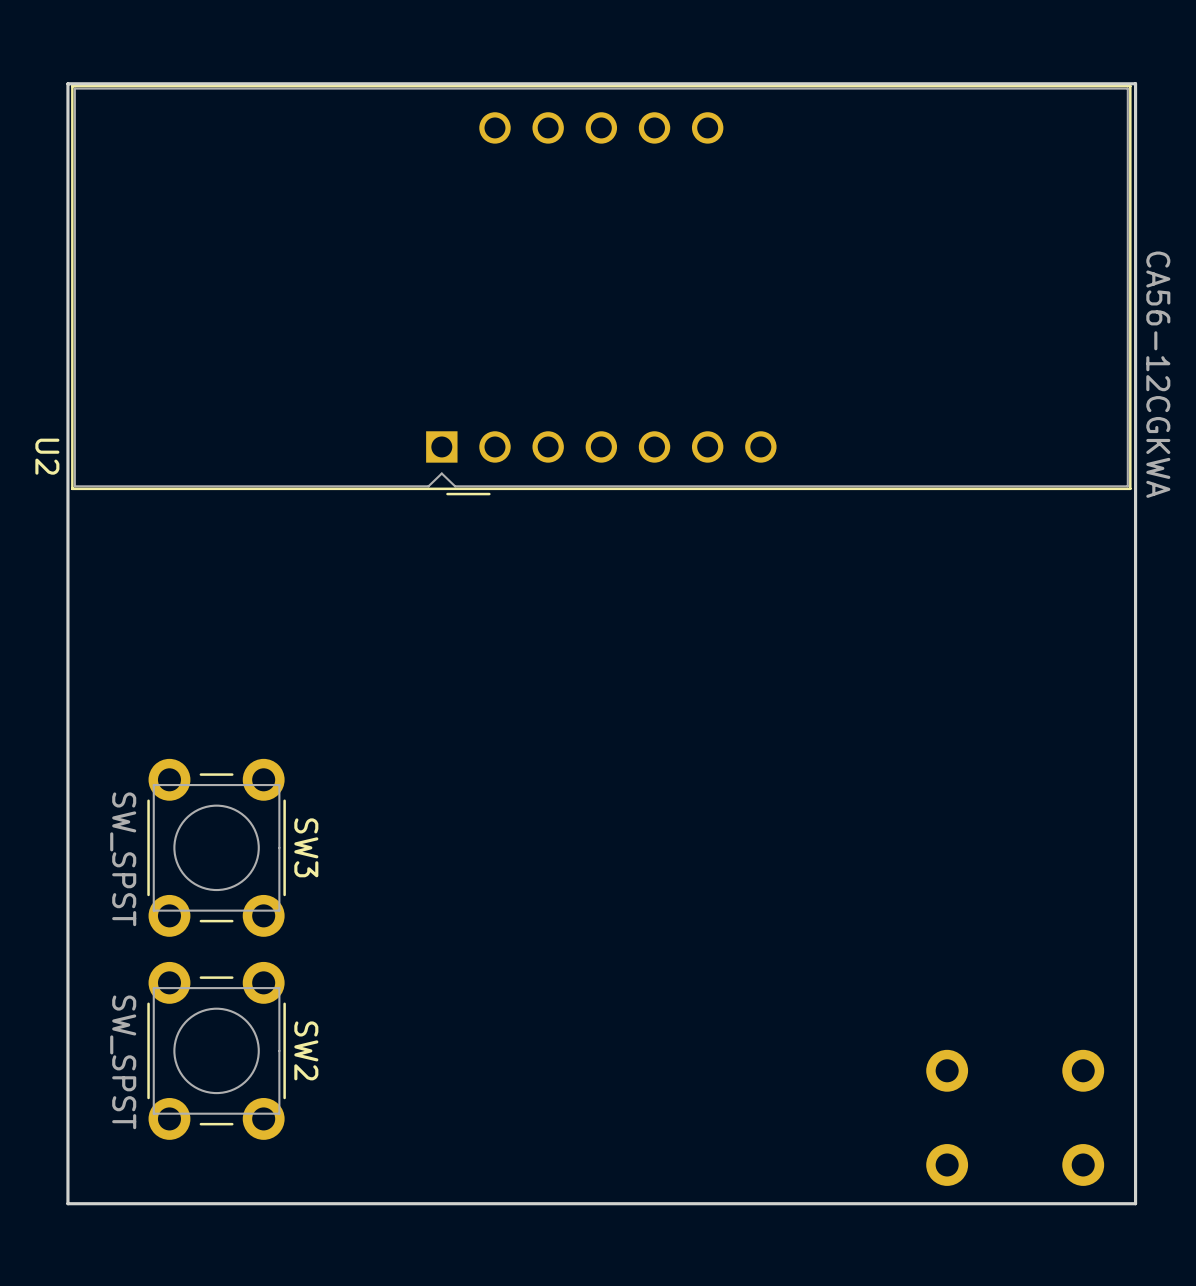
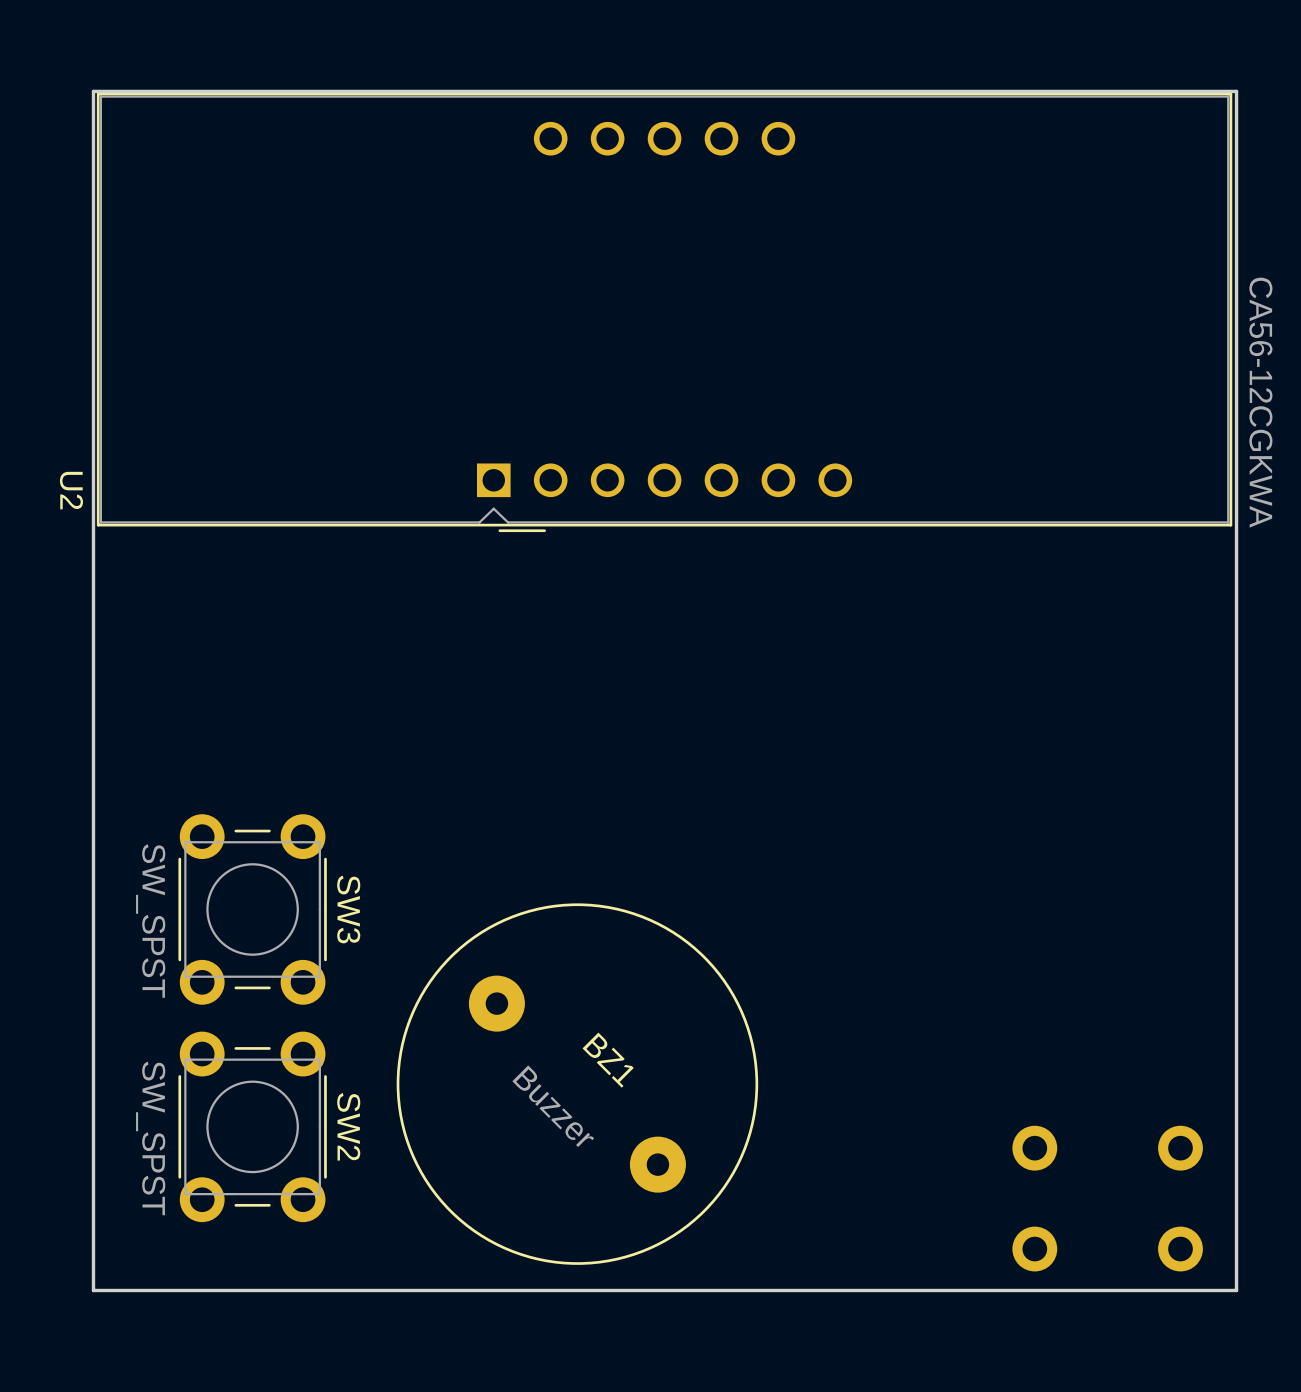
BZ1: none -> Buzzer (577, 1084)

